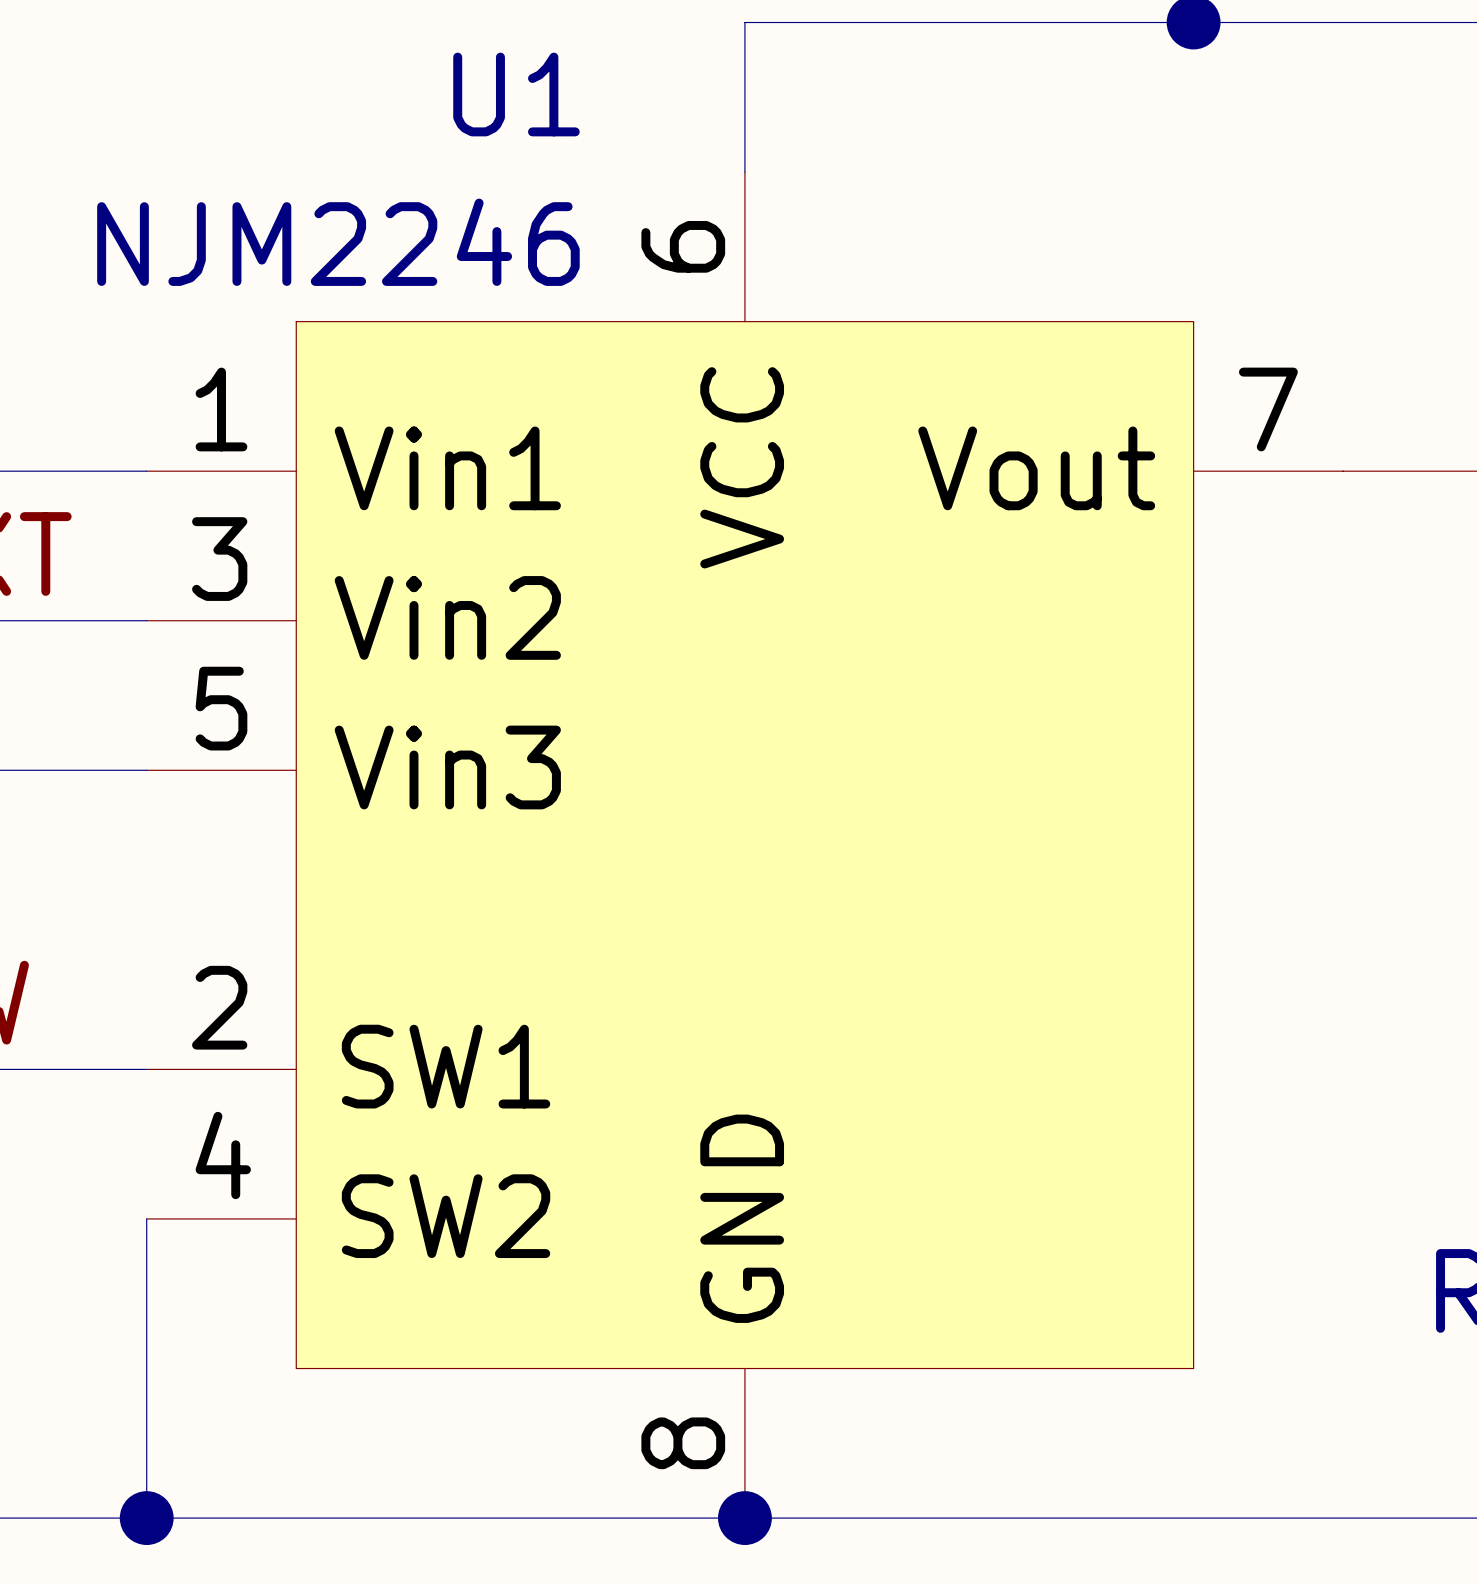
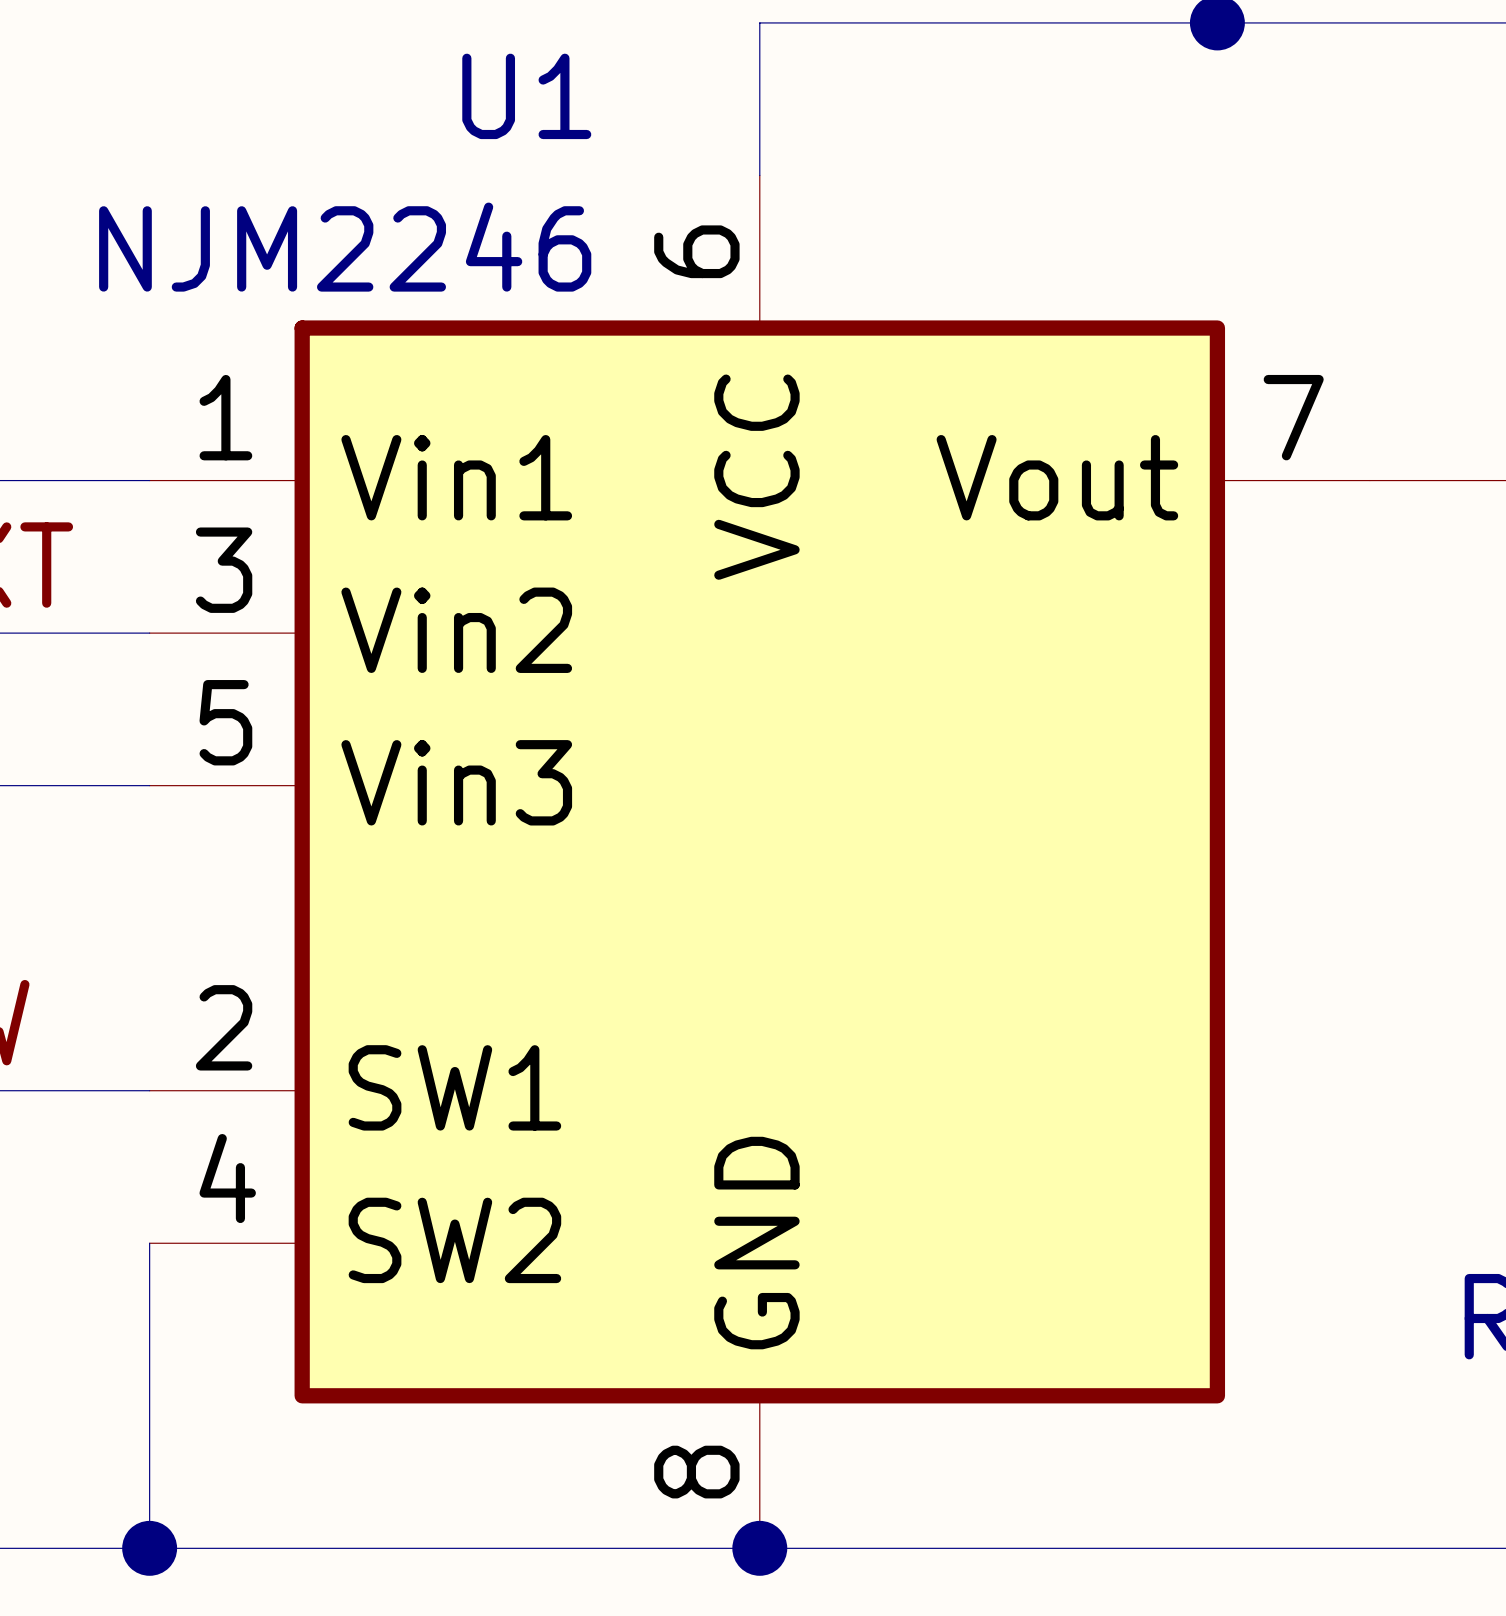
U1 symbol: [146, 172, 1344, 1519] -> [149, 175, 1370, 1549]

